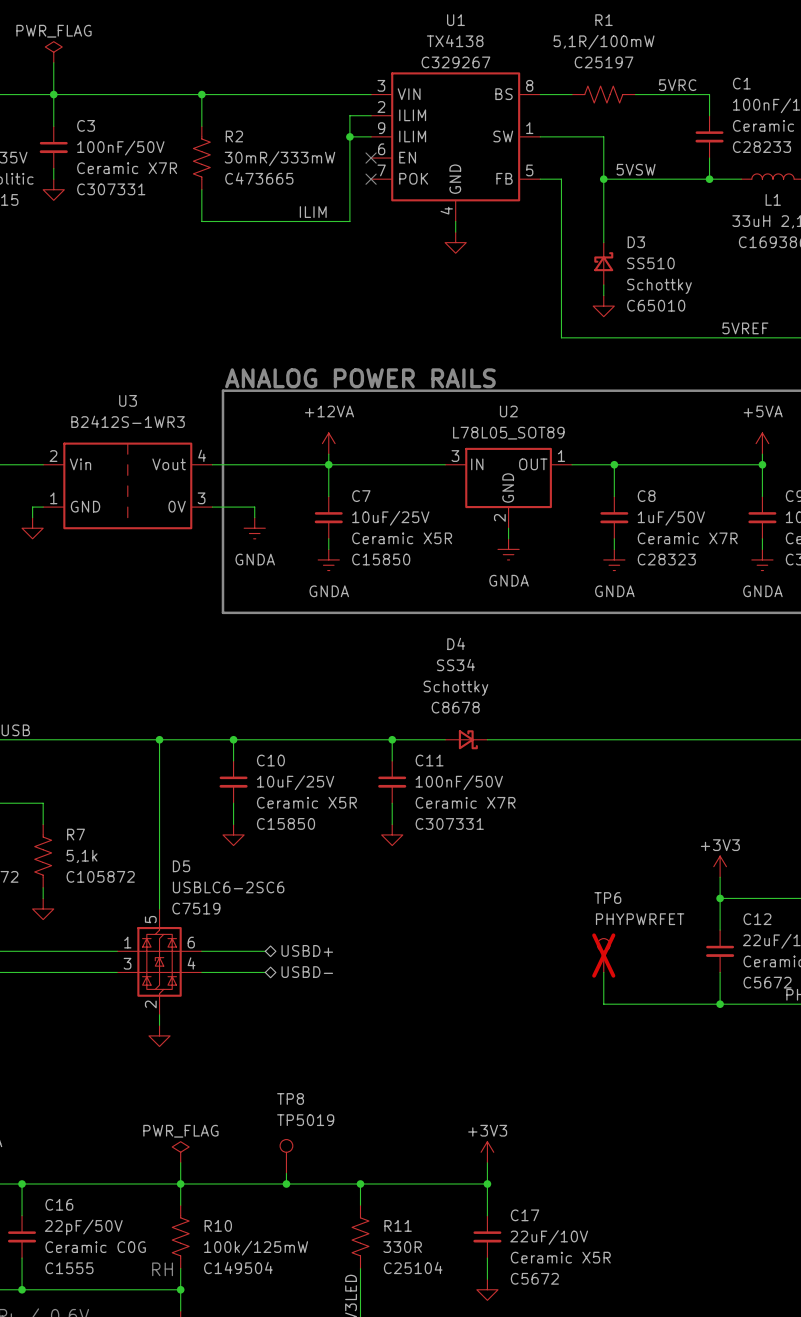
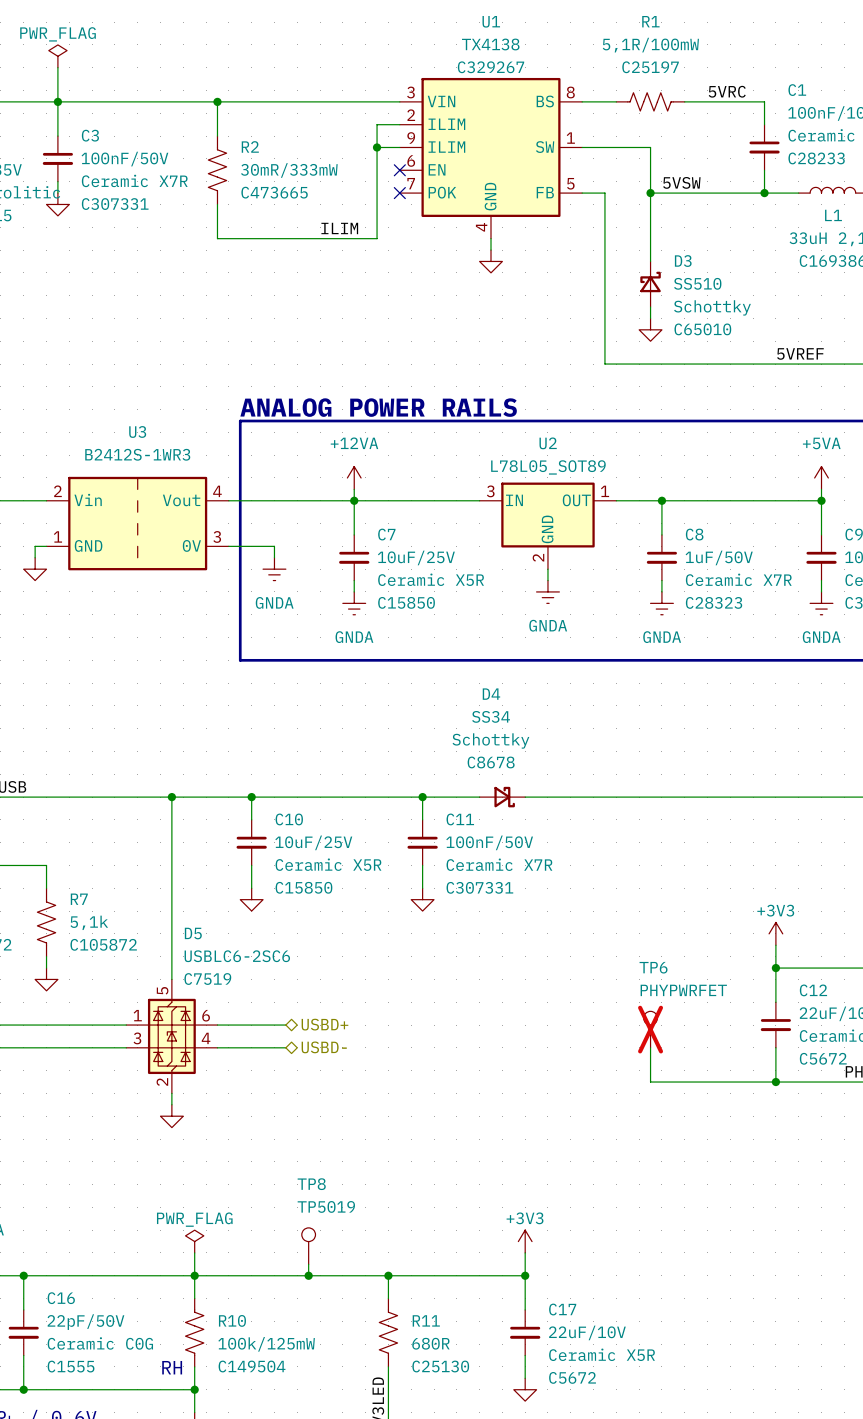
R11 value: 330R (402, 1247) -> 680R (430, 1343)
R11 text: C25104 (413, 1267) -> C25130 (440, 1366)

